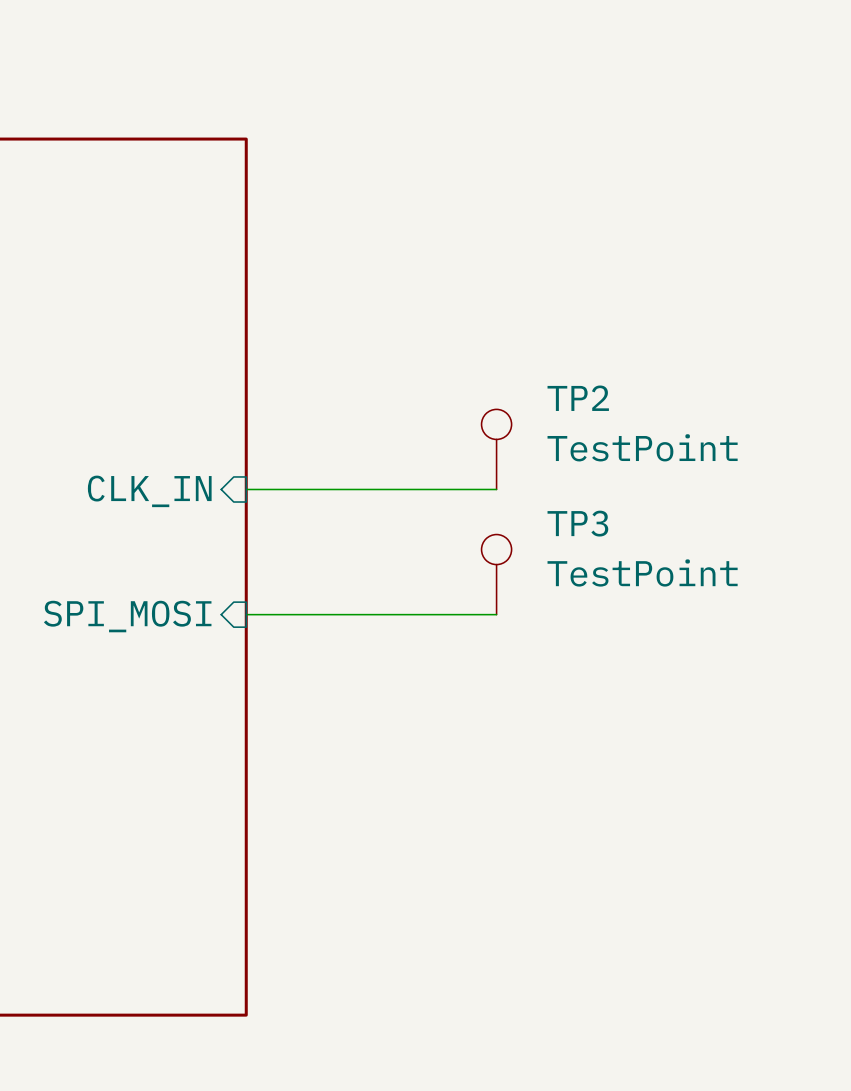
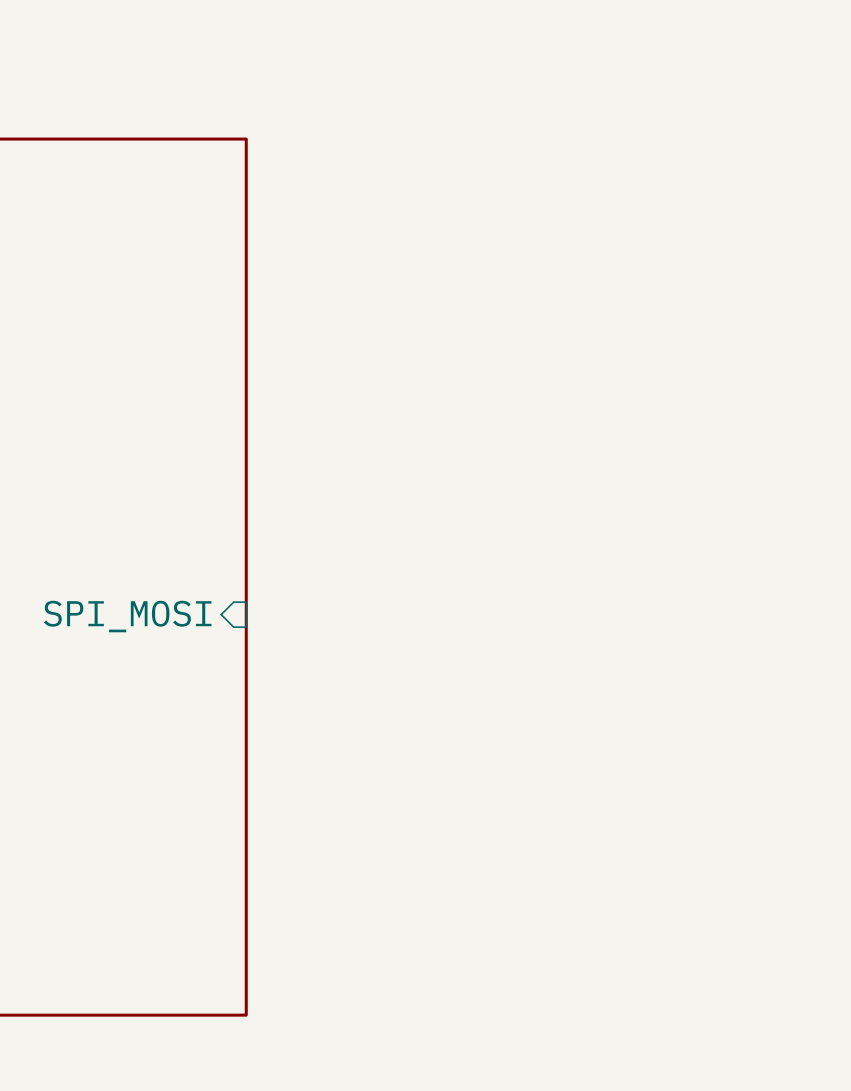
TP2: TestPoint (496, 449) -> none
wire: (246, 489) (496, 489) -> none
sheet pin: CLK_IN (149, 491) -> none
TP3: TestPoint (496, 574) -> none
wire: (246, 614) (496, 614) -> none

